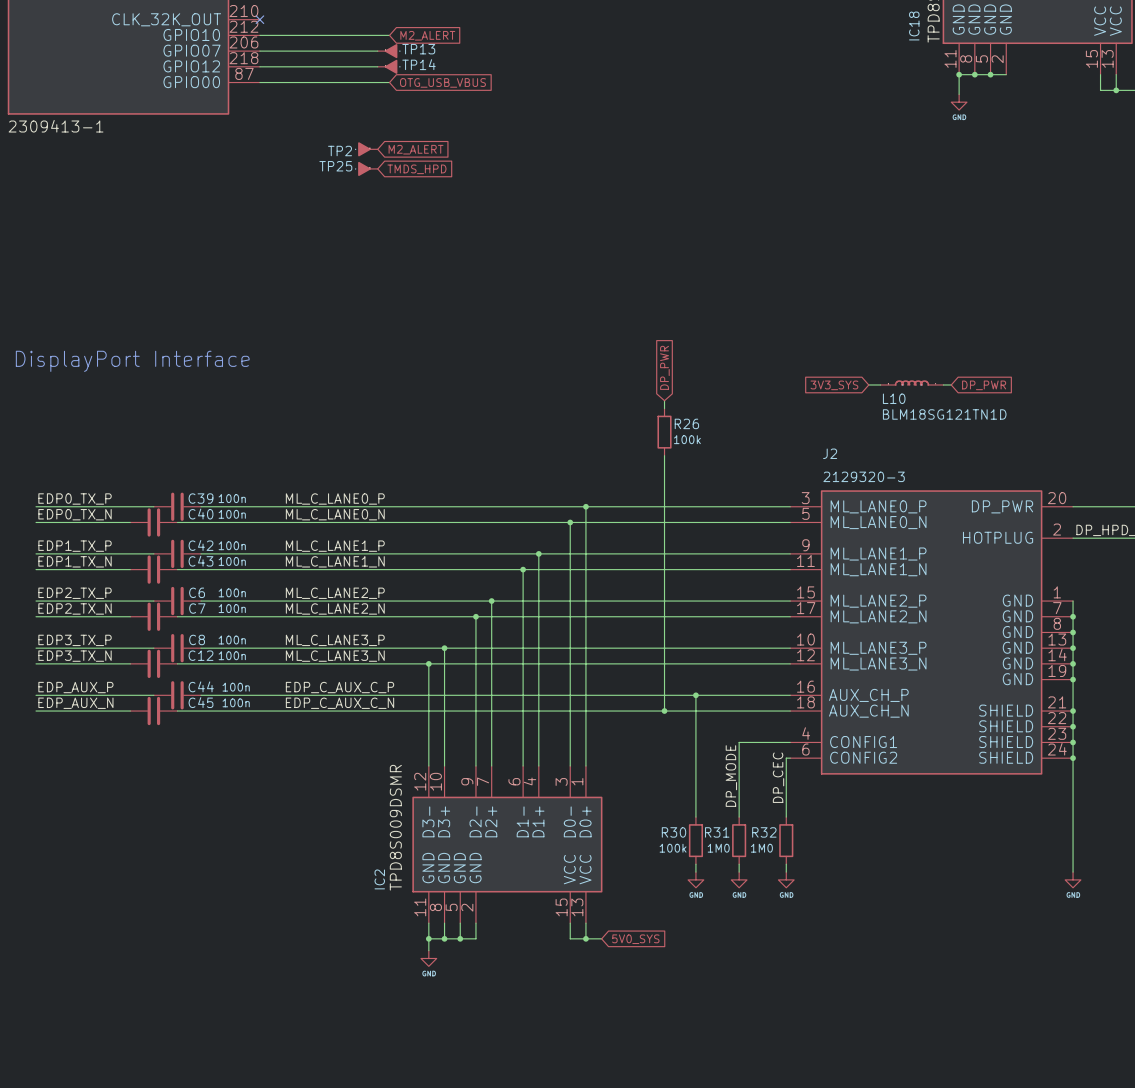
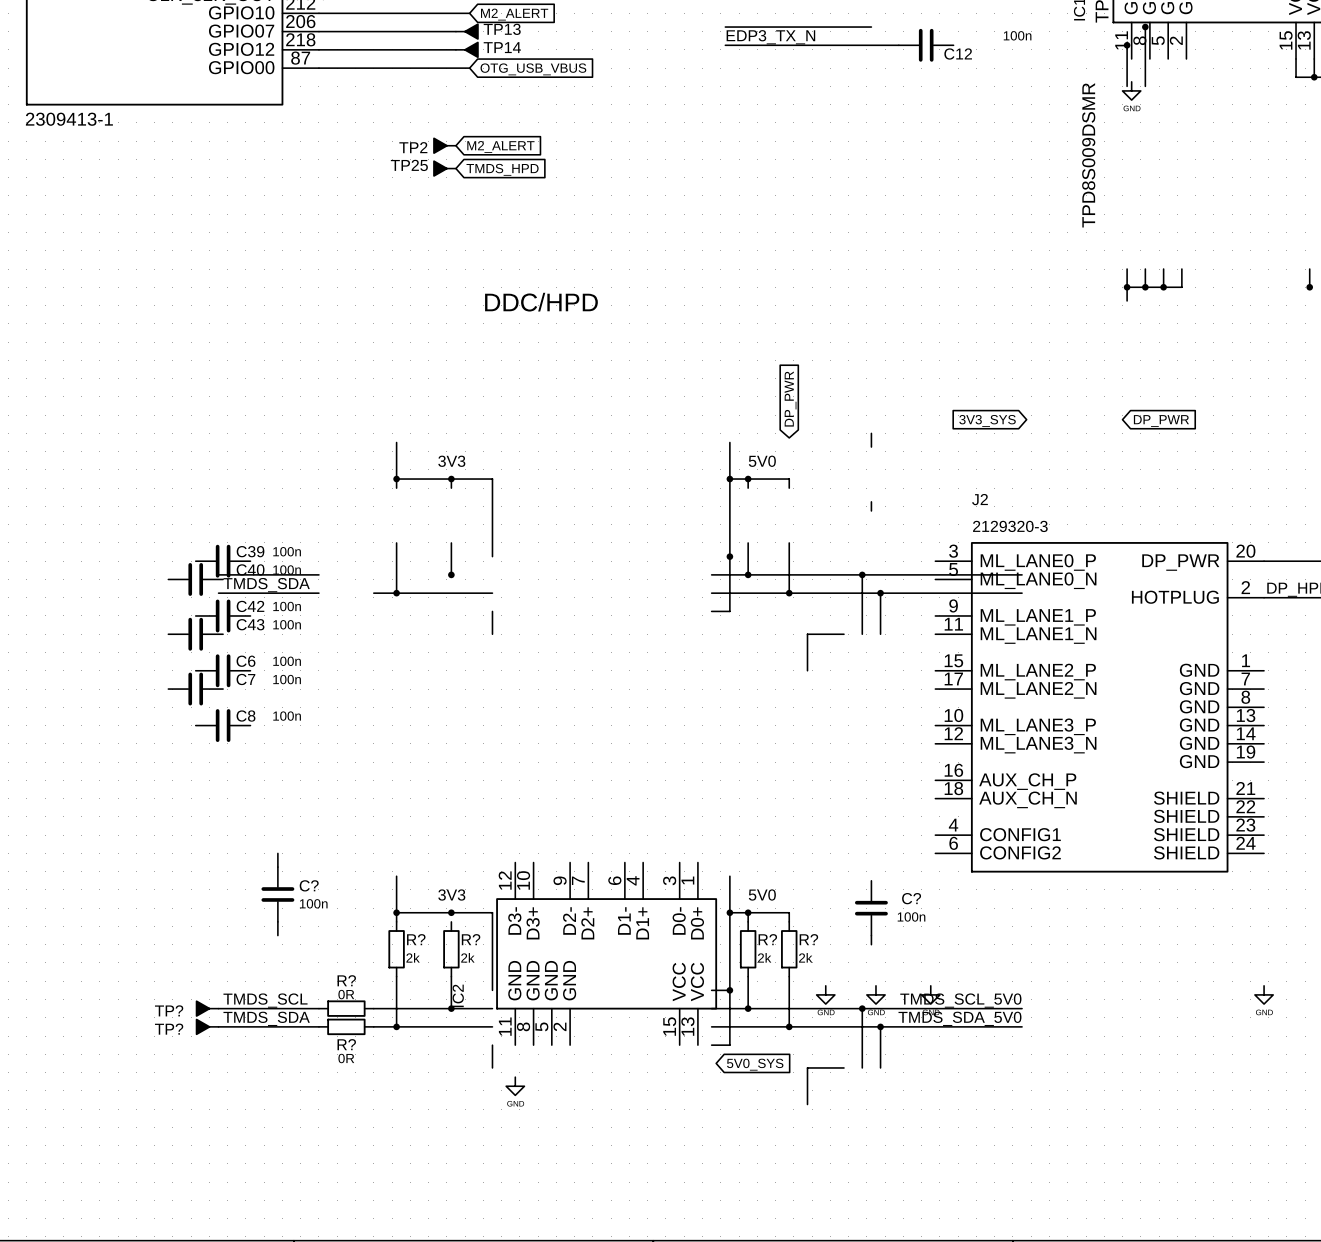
wire: none -> (725, 27) (871, 27)
wire: none -> (1145, 27) (1145, 86)
junction: none -> (1145, 27)
label: none -> EDP3_TX_N (770, 37)
wire: none -> (725, 45) (898, 45)
wire: none -> (1127, 45) (1127, 86)
junction: none -> (1127, 45)
junction: (959, 74) -> none
junction: (974, 74) -> none
junction: (990, 74) -> none
wire: (1006, 74) (959, 74) (959, 94) -> none
label: none -> TPD8S009DSMR (1088, 155)
wire: none -> (1127, 269) (1127, 300)
wire: none -> (1145, 269) (1145, 287)
wire: none -> (1163, 269) (1163, 287)
wire: none -> (1181, 269) (1181, 287) (1127, 287)
wire: none -> (1309, 269) (1309, 287)
junction: none -> (1127, 287)
junction: none -> (1145, 287)
junction: none -> (1163, 287)
junction: none -> (1309, 287)
text: none -> DDC/HPD (541, 302)
text: DisplayPort Interface (132, 361) -> none
L10: BLM18SG121TN1D (911, 383) -> none
wire: (868, 384) (880, 384) -> none
wire: (943, 384) (951, 384) -> none
wire: none -> (871, 433) (871, 447)
wire: (664, 400) (664, 408) -> (748, 479) (748, 488)
wire: none -> (396, 442) (396, 488)
wire: none -> (729, 442) (729, 611) (711, 611)
text: none -> 3V3 (451, 461)
text: none -> 5V0 (762, 461)
R26: (664, 432) -> none
wire: none -> (396, 479) (492, 479) (492, 556)
junction: none -> (396, 479)
wire: none -> (451, 479) (451, 488)
junction: none -> (451, 479)
wire: none -> (729, 479) (789, 479) (789, 488)
junction: none -> (729, 479)
junction: none -> (748, 479)
wire: (664, 455) (664, 491) -> (880, 593) (880, 634)
wire: none -> (871, 501) (871, 510)
wire: none -> (396, 542) (396, 593)
wire: none -> (451, 542) (451, 574)
wire: none -> (748, 542) (748, 574)
label: EDP0_TX_P (75, 498) -> none
label: ML_C_LANE0_P (335, 498) -> none
junction: none -> (729, 556)
wire: (36, 506) (153, 506) -> none
wire: (201, 506) (790, 506) -> none
wire: (585, 506) (585, 766) -> none
junction: (585, 506) -> none
label: EDP0_TX_N (75, 514) -> none
label: ML_C_LANE0_N (335, 514) -> none
wire: none -> (218, 574) (318, 574)
junction: none -> (451, 574)
wire: none -> (711, 574) (1022, 574)
junction: none -> (748, 574)
wire: none -> (862, 574) (862, 634)
junction: none -> (862, 574)
wire: (36, 522) (130, 522) -> none
wire: (177, 522) (790, 522) -> none
wire: (570, 522) (570, 766) -> none
junction: (570, 522) -> none
label: none -> TMDS_SDA (266, 585)
wire: none -> (218, 593) (318, 593)
wire: none -> (373, 593) (492, 593)
junction: none -> (396, 593)
wire: none -> (711, 593) (1022, 593)
wire: (664, 534) (664, 711) -> none
junction: none -> (789, 593)
junction: none -> (880, 593)
label: EDP1_TX_P (75, 546) -> none
label: ML_C_LANE1_P (335, 546) -> none
wire: none -> (492, 611) (492, 634)
wire: (36, 553) (153, 553) -> none
wire: (201, 553) (790, 553) -> none
wire: (538, 553) (538, 766) -> none
junction: (538, 553) -> none
label: EDP1_TX_N (75, 561) -> none
label: ML_C_LANE1_N (335, 561) -> none
wire: (36, 569) (130, 569) -> none
wire: (177, 569) (680, 569) -> (807, 670) (807, 634)
wire: (523, 569) (523, 766) -> none
junction: (523, 569) -> none
wire: (711, 569) (790, 569) -> none
label: EDP2_TX_P (75, 593) -> none
label: ML_C_LANE2_P (335, 593) -> none
wire: (36, 601) (153, 601) -> none
wire: (201, 601) (790, 601) -> none
wire: (491, 601) (491, 766) -> none
junction: (491, 601) -> none
wire: (1073, 601) (1073, 872) -> none
label: EDP2_TX_N (75, 608) -> none
label: ML_C_LANE2_N (335, 608) -> none
wire: (36, 616) (130, 616) -> none
wire: (177, 616) (790, 616) -> none
wire: (475, 616) (475, 766) -> none
junction: (475, 616) -> none
junction: (1073, 616) -> none
junction: (1073, 632) -> none
label: EDP3_TX_P (75, 640) -> none
label: ML_C_LANE3_P (335, 640) -> none
wire: (36, 648) (153, 648) -> none
wire: (201, 648) (790, 648) -> none
wire: (444, 648) (444, 766) -> none
junction: (444, 648) -> none
junction: (1073, 648) -> none
C12 name position: C12 (201, 655) -> C12 (958, 54)
label: EDP3_TX_N (75, 656) -> none
label: ML_C_LANE3_N (335, 656) -> none
wire: (36, 663) (130, 663) -> none
C12 position: (153, 663) -> (926, 45)
wire: (177, 663) (790, 663) -> none
wire: (428, 663) (428, 766) -> none
junction: (428, 663) -> none
junction: (1073, 663) -> none
junction: (1073, 679) -> none
label: EDP_AUX_P (75, 687) -> none
label: EDP_C_AUX_C_P (340, 687) -> none
wire: (36, 695) (153, 695) -> none
C44: (177, 695) -> none
wire: (201, 695) (790, 695) -> none
wire: (695, 695) (695, 817) -> none
junction: (695, 695) -> none
label: EDP_AUX_N (75, 703) -> none
label: EDP_C_AUX_C_N (340, 703) -> none
wire: (36, 711) (130, 711) -> none
C45: (153, 711) -> none
wire: (177, 711) (790, 711) -> none
junction: (664, 711) -> none
junction: (1073, 711) -> none
junction: (1073, 726) -> none
wire: (790, 742) (739, 742) (739, 817) -> none
junction: (1073, 742) -> none
wire: none -> (277, 853) (277, 867)
wire: (790, 758) (786, 758) (786, 817) -> none
junction: (1073, 758) -> none
label: DP_MODE (731, 776) -> none
wire: none -> (396, 876) (396, 921)
wire: none -> (729, 876) (729, 1045) (711, 1045)
label: DP_CEC (778, 777) -> none
C?: none -> (277, 894)
text: none -> 3V3 (451, 895)
text: none -> 5V0 (762, 895)
C?: none -> (871, 908)
wire: none -> (396, 912) (492, 912) (492, 990)
junction: none -> (396, 912)
junction: none -> (451, 912)
wire: none -> (729, 912) (789, 912) (789, 921)
junction: none -> (729, 912)
junction: none -> (748, 912)
wire: none -> (277, 921) (277, 935)
label: TPD8S009DSMR (395, 827) -> none
R?: none -> (396, 949)
R?: none -> (451, 949)
R?: none -> (748, 949)
R?: none -> (789, 949)
R30: (695, 840) -> none
R31: (739, 840) -> none
R32: (786, 840) -> none
wire: none -> (396, 976) (396, 1026)
wire: none -> (748, 976) (748, 1008)
wire: none -> (789, 976) (789, 1026)
wire: (695, 864) (695, 872) -> (748, 912) (748, 921)
wire: (739, 864) (739, 872) -> (871, 935) (871, 944)
wire: (786, 864) (786, 872) -> none
wire: none -> (711, 990) (729, 990)
junction: none -> (729, 990)
label: none -> TMDS_SCL (265, 1000)
label: none -> TMDS_SCL_5V0 (960, 1000)
TP?: none -> (207, 1008)
wire: none -> (218, 1008) (318, 1008)
R?: none -> (346, 1008)
wire: none -> (373, 1008) (492, 1008)
junction: none -> (451, 1008)
wire: none -> (711, 1008) (1022, 1008)
junction: none -> (748, 1008)
wire: none -> (862, 1008) (862, 1067)
junction: none -> (862, 1008)
label: none -> TMDS_SDA (266, 1018)
label: none -> TMDS_SDA_5V0 (959, 1018)
TP?: none -> (207, 1026)
wire: none -> (218, 1026) (318, 1026)
R?: none -> (346, 1026)
wire: none -> (373, 1026) (492, 1026)
junction: none -> (396, 1026)
wire: none -> (711, 1026) (1022, 1026)
junction: none -> (789, 1026)
wire: none -> (880, 1026) (880, 1067)
junction: none -> (880, 1026)
wire: none -> (492, 1045) (492, 1067)
wire: (428, 923) (428, 950) -> (451, 976) (451, 1008)
wire: (444, 923) (444, 938) -> none
wire: (460, 923) (460, 938) -> none
wire: (475, 923) (475, 938) (428, 938) -> none
wire: (570, 923) (570, 938) (601, 938) -> none
wire: (585, 923) (585, 938) -> none
junction: (428, 938) -> none
junction: (444, 938) -> none
junction: (460, 938) -> none
junction: (585, 938) -> none
wire: none -> (844, 1067) (807, 1067) (807, 1104)

